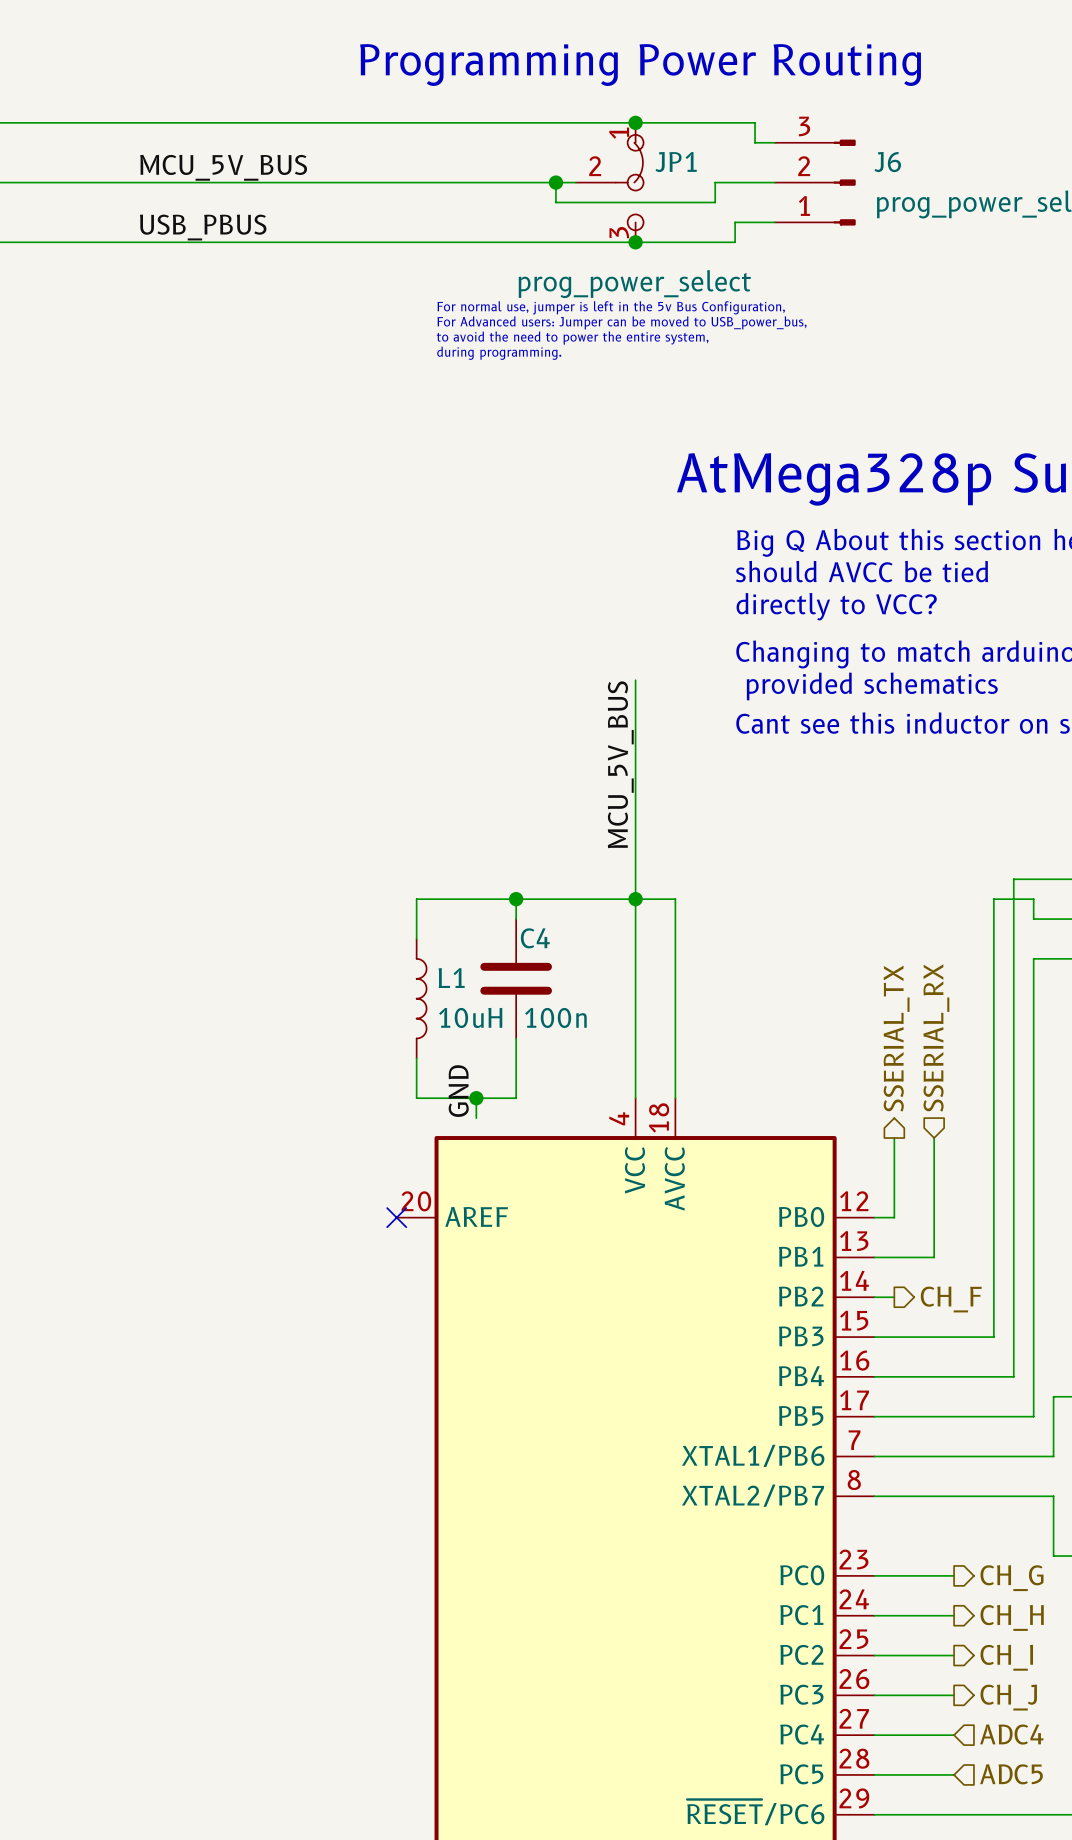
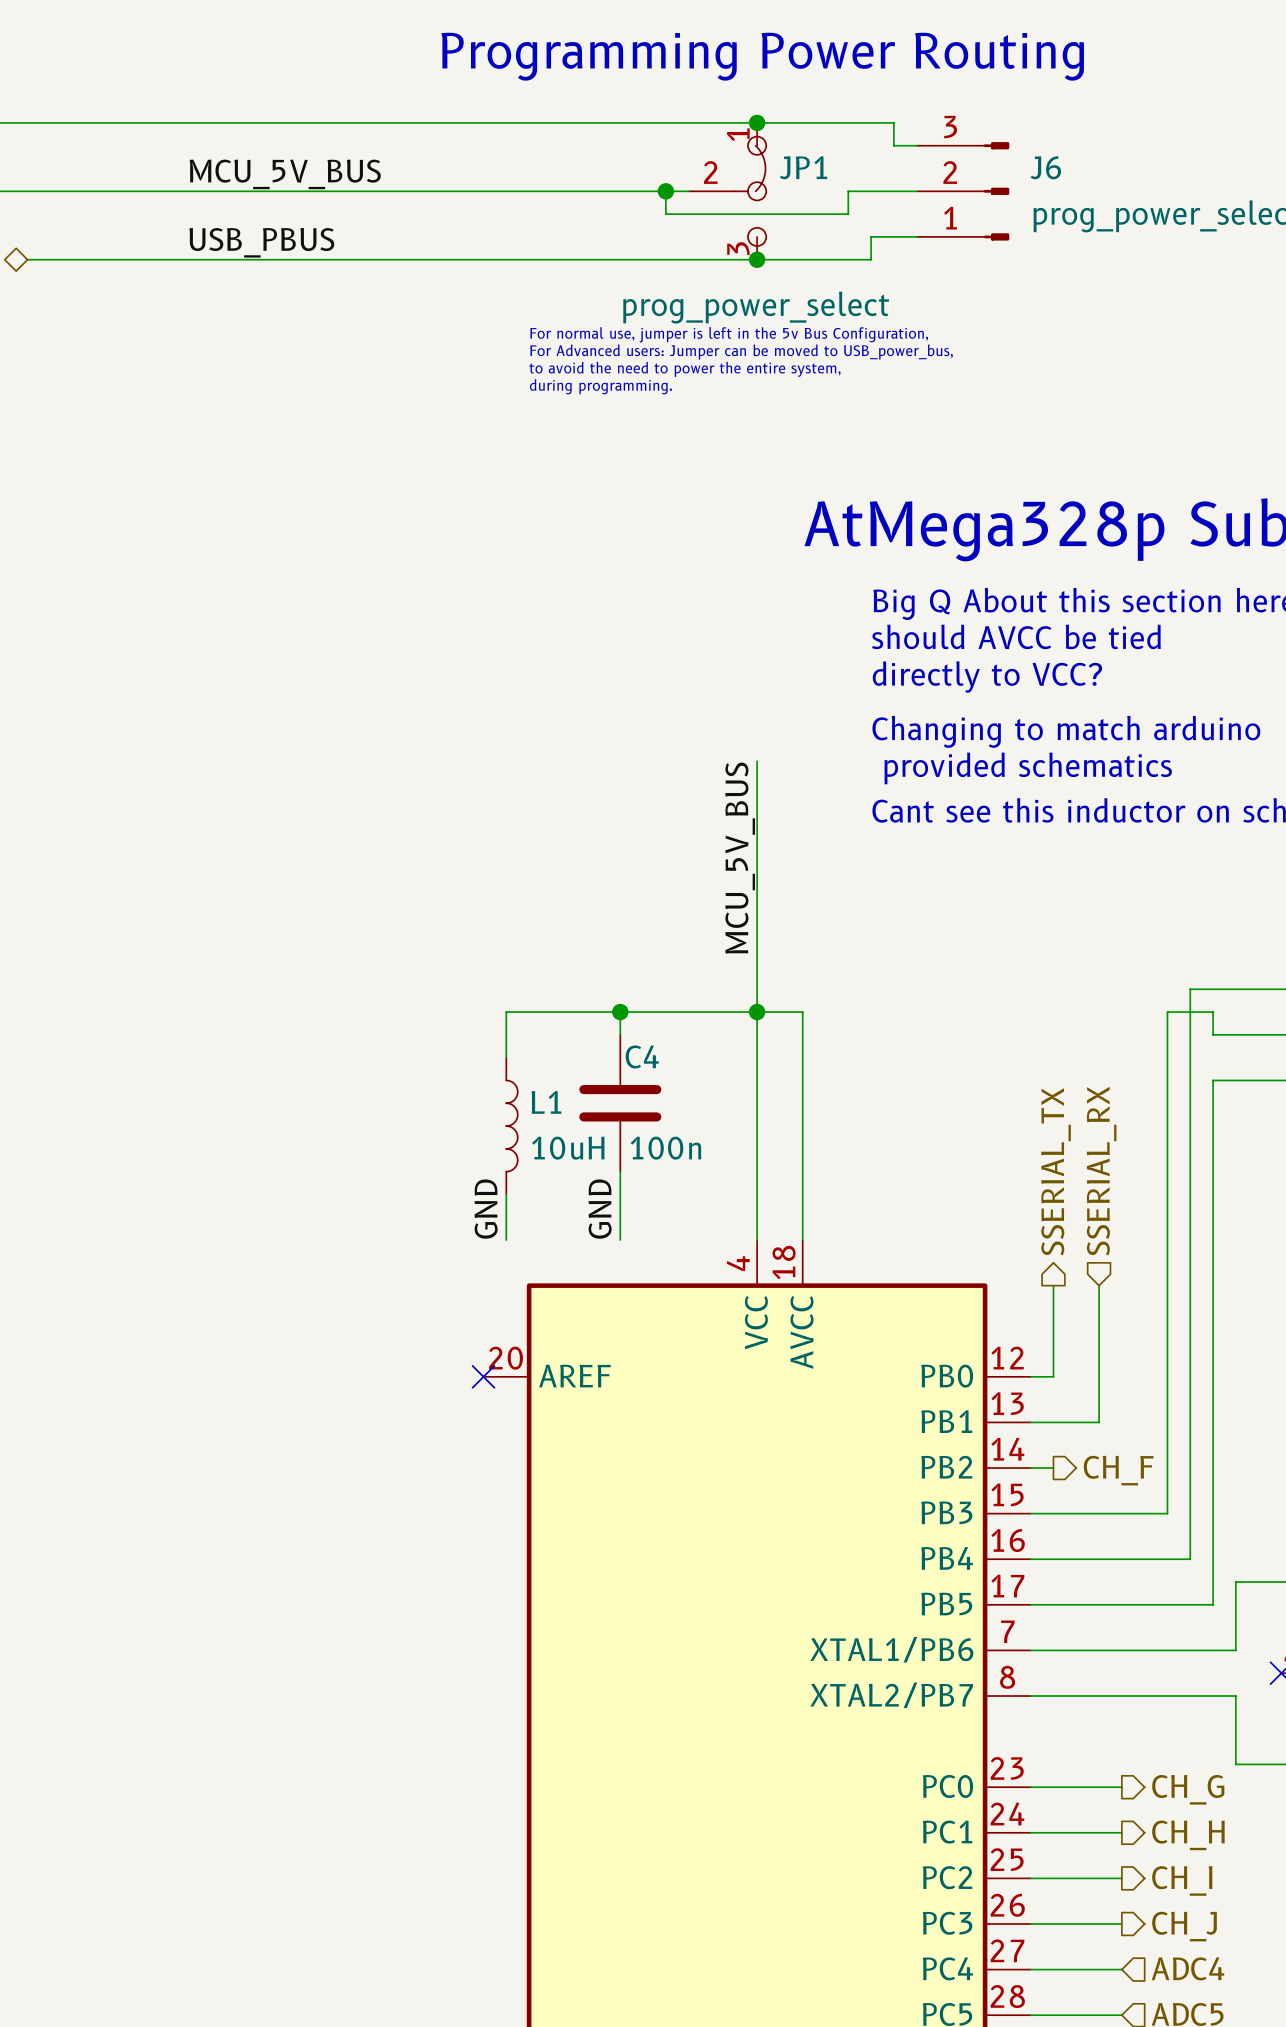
label: none -> GND (486, 1209)
label position: GND (458, 1091) -> GND (600, 1209)
wire: (416, 1098) (516, 1098) -> none
wire: (476, 1098) (476, 1118) -> none
junction: (476, 1098) -> none

